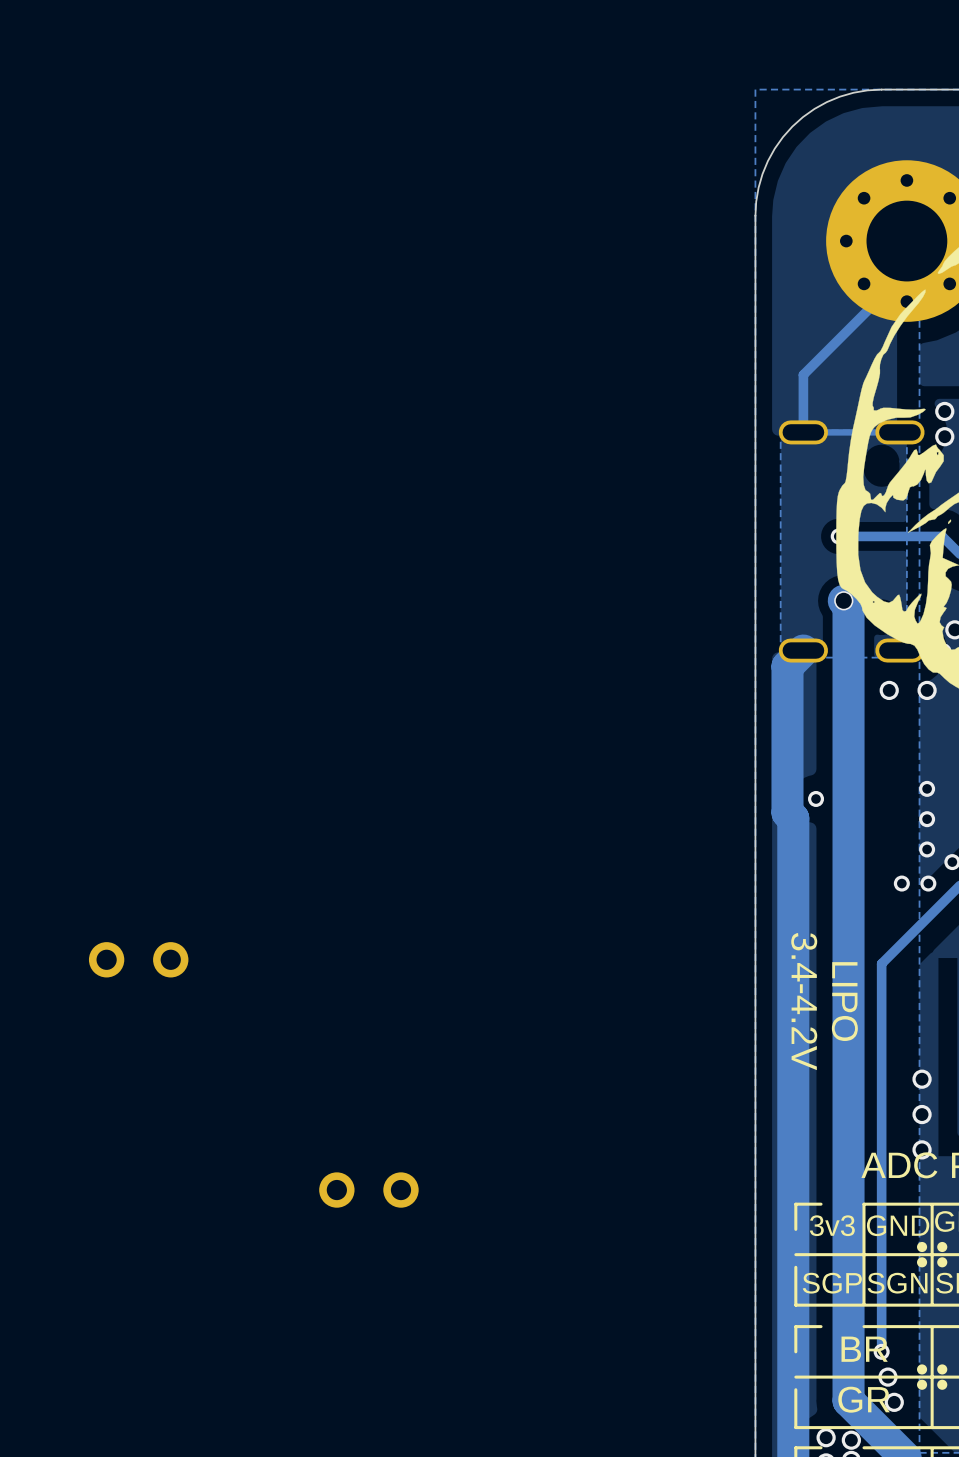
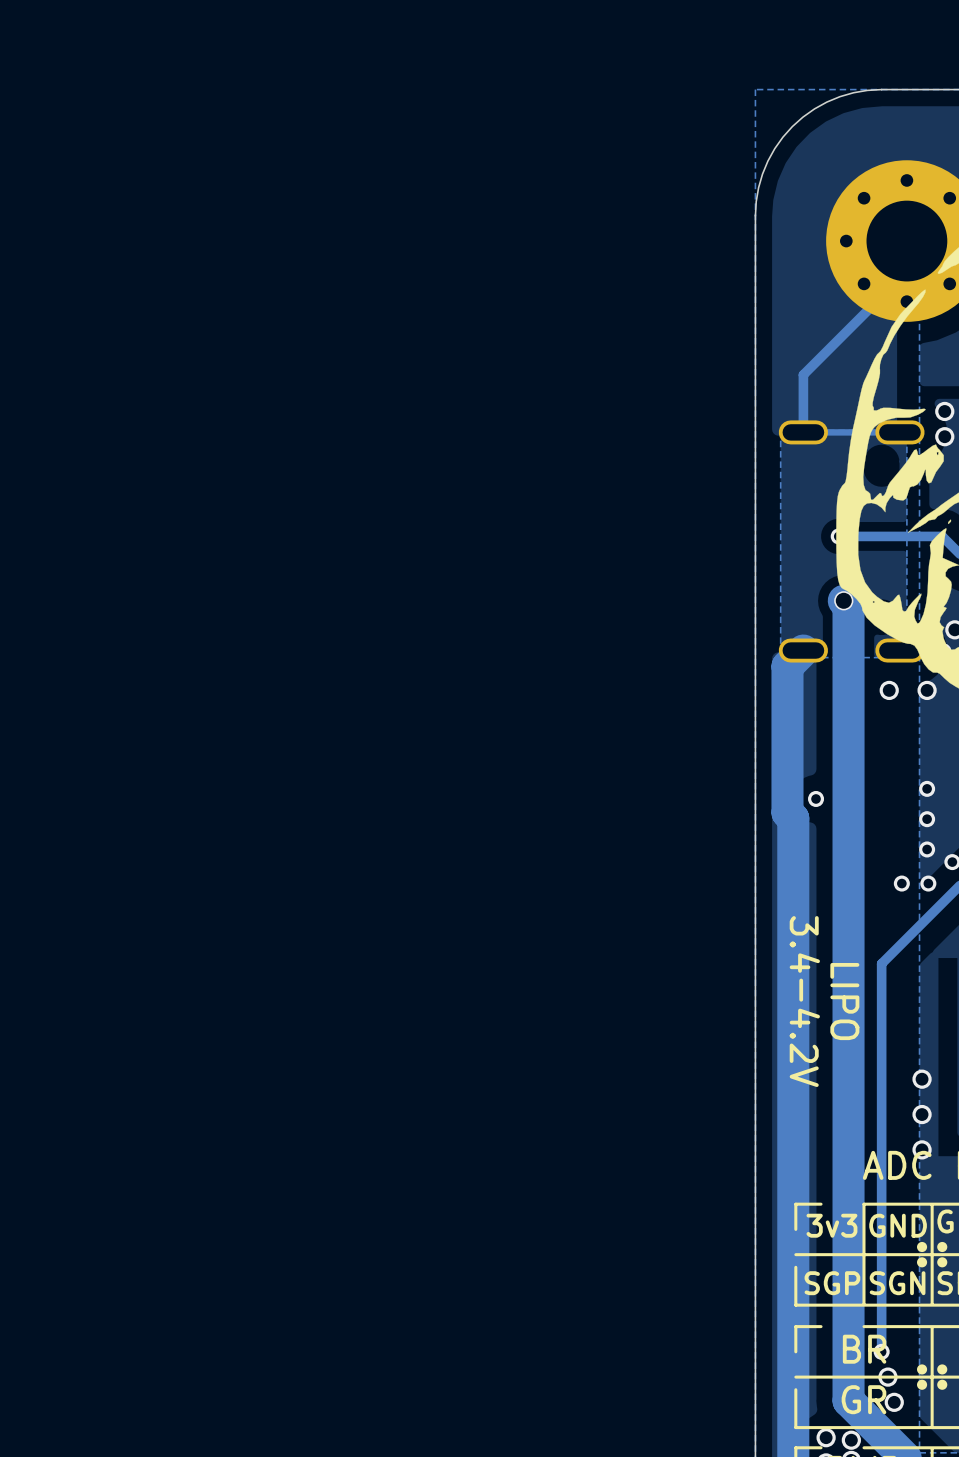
part: (138, 959) -> none
part: (368, 1190) -> none

